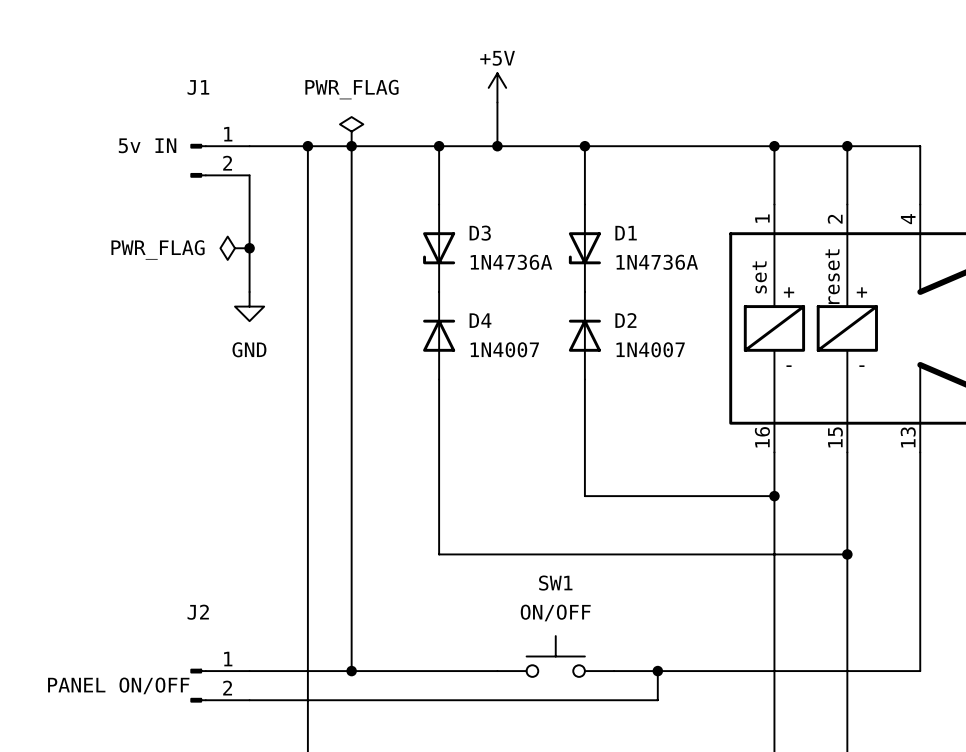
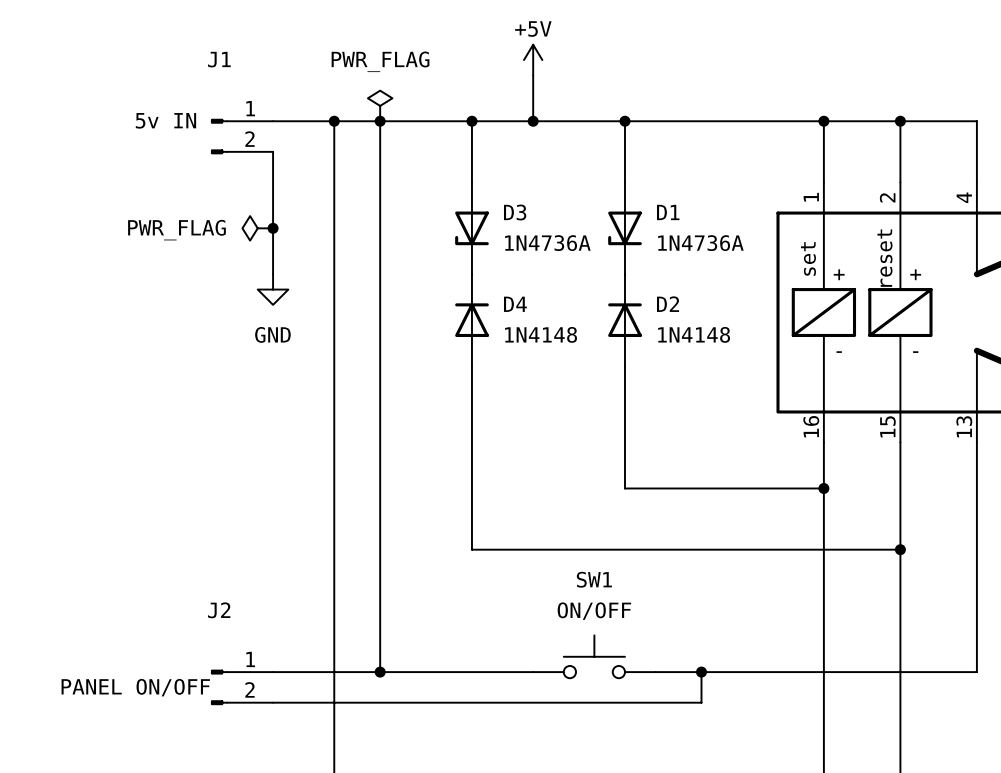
D4 value: 1N4007 (504, 349) -> 1N4148 (541, 334)
D2 value: 1N4007 (650, 349) -> 1N4148 (694, 334)

